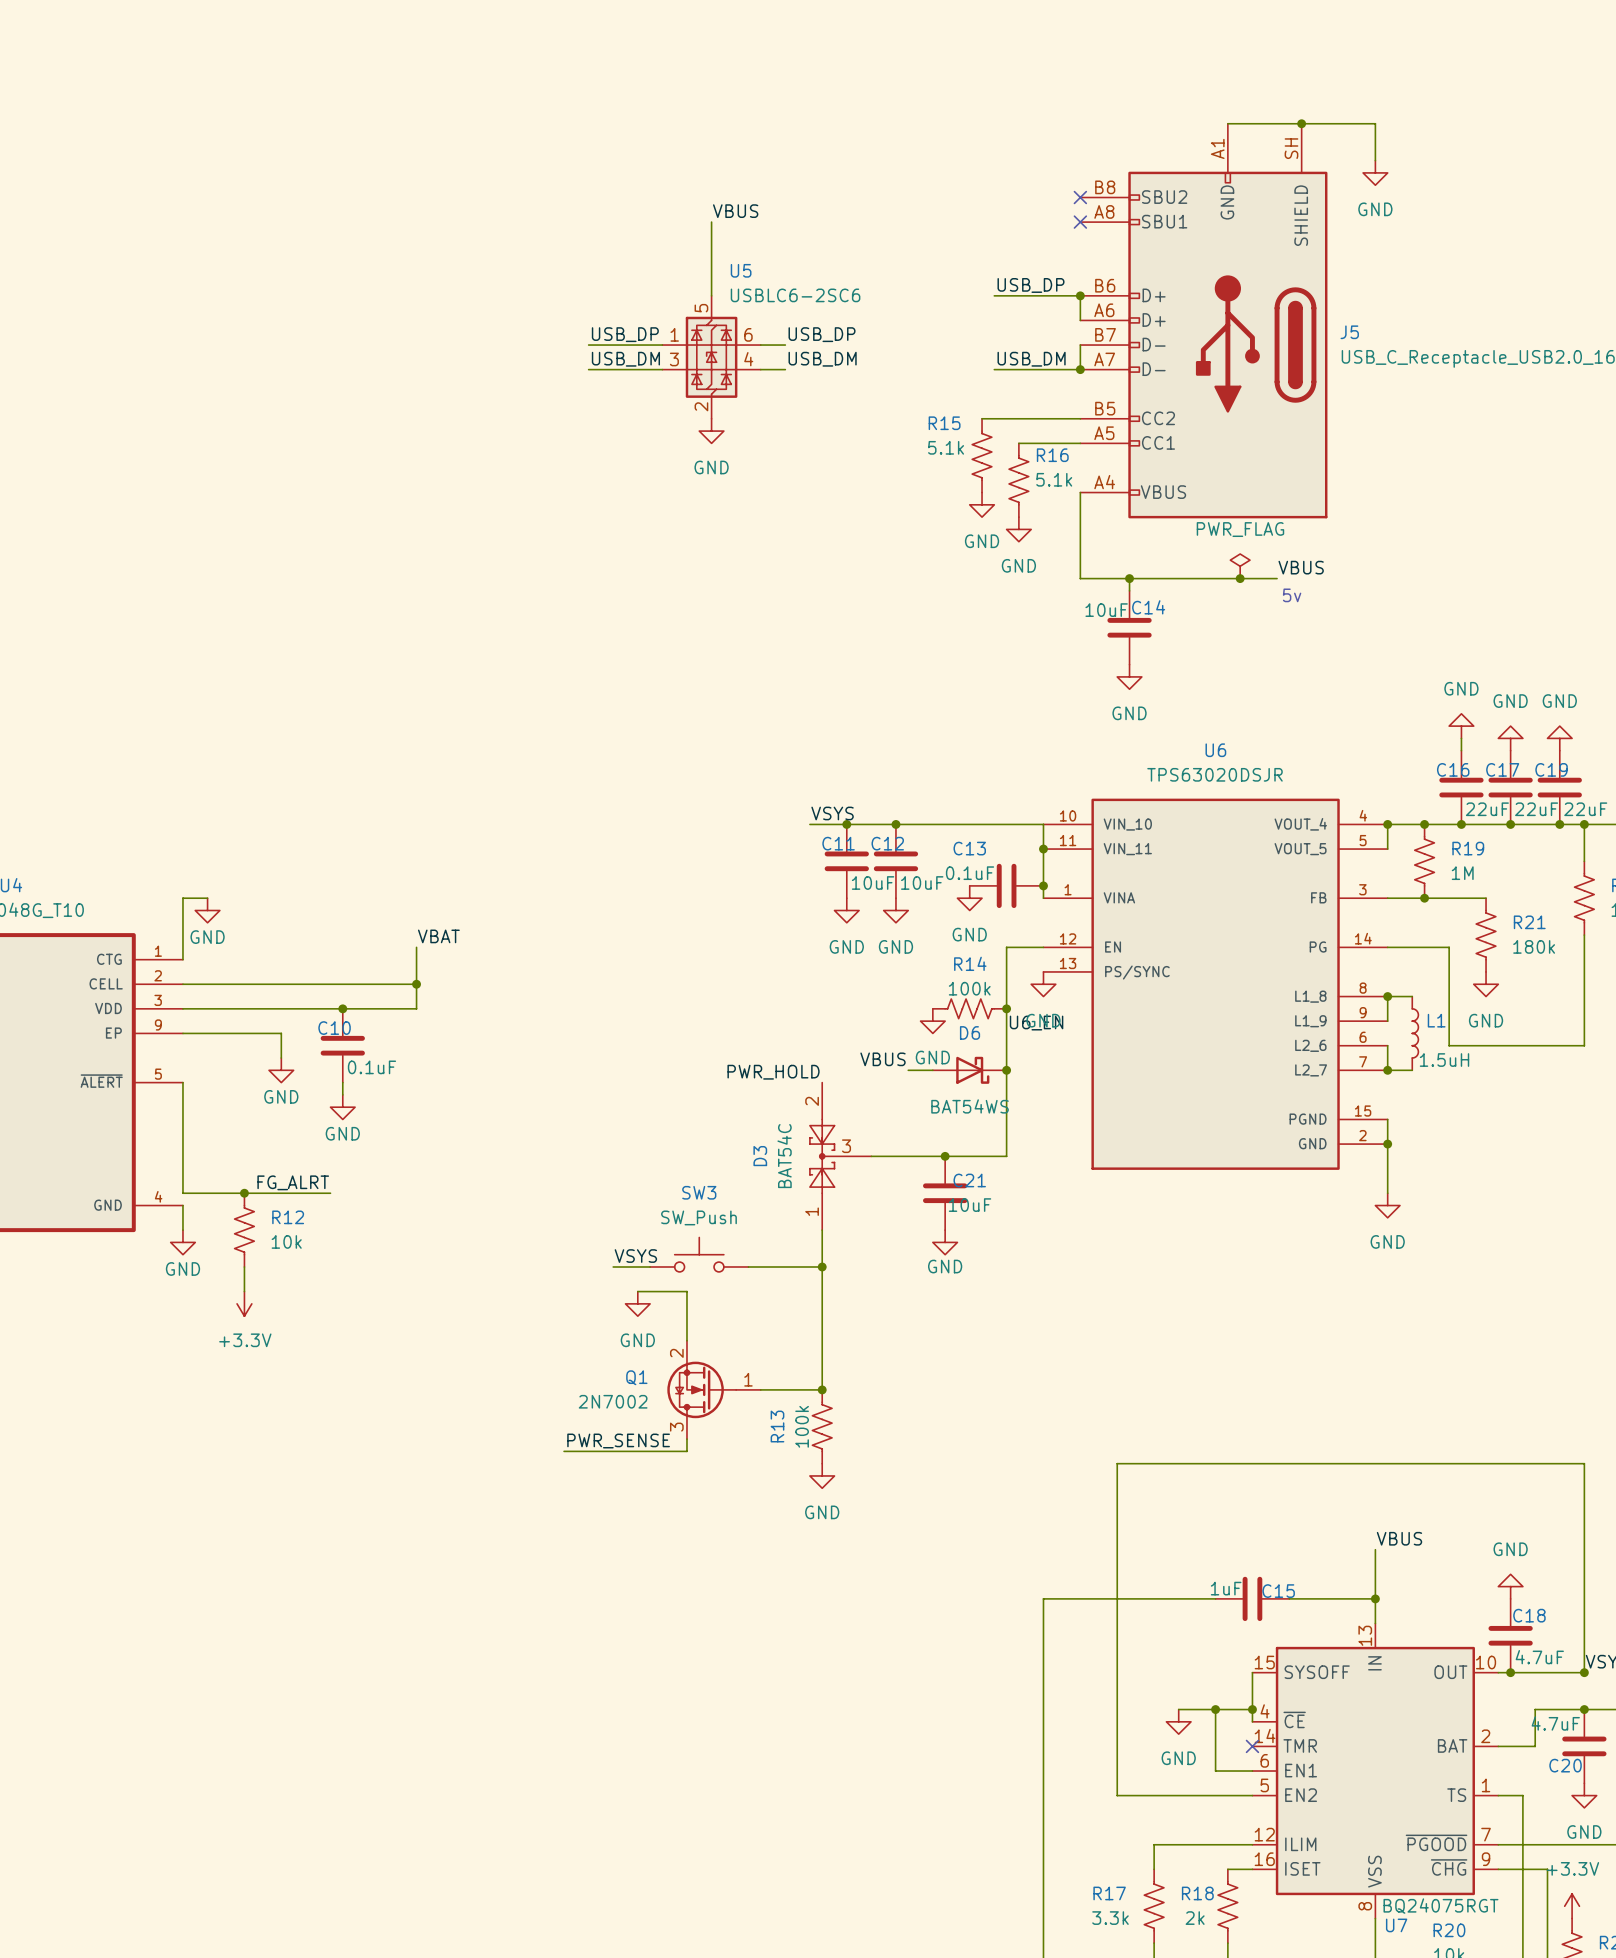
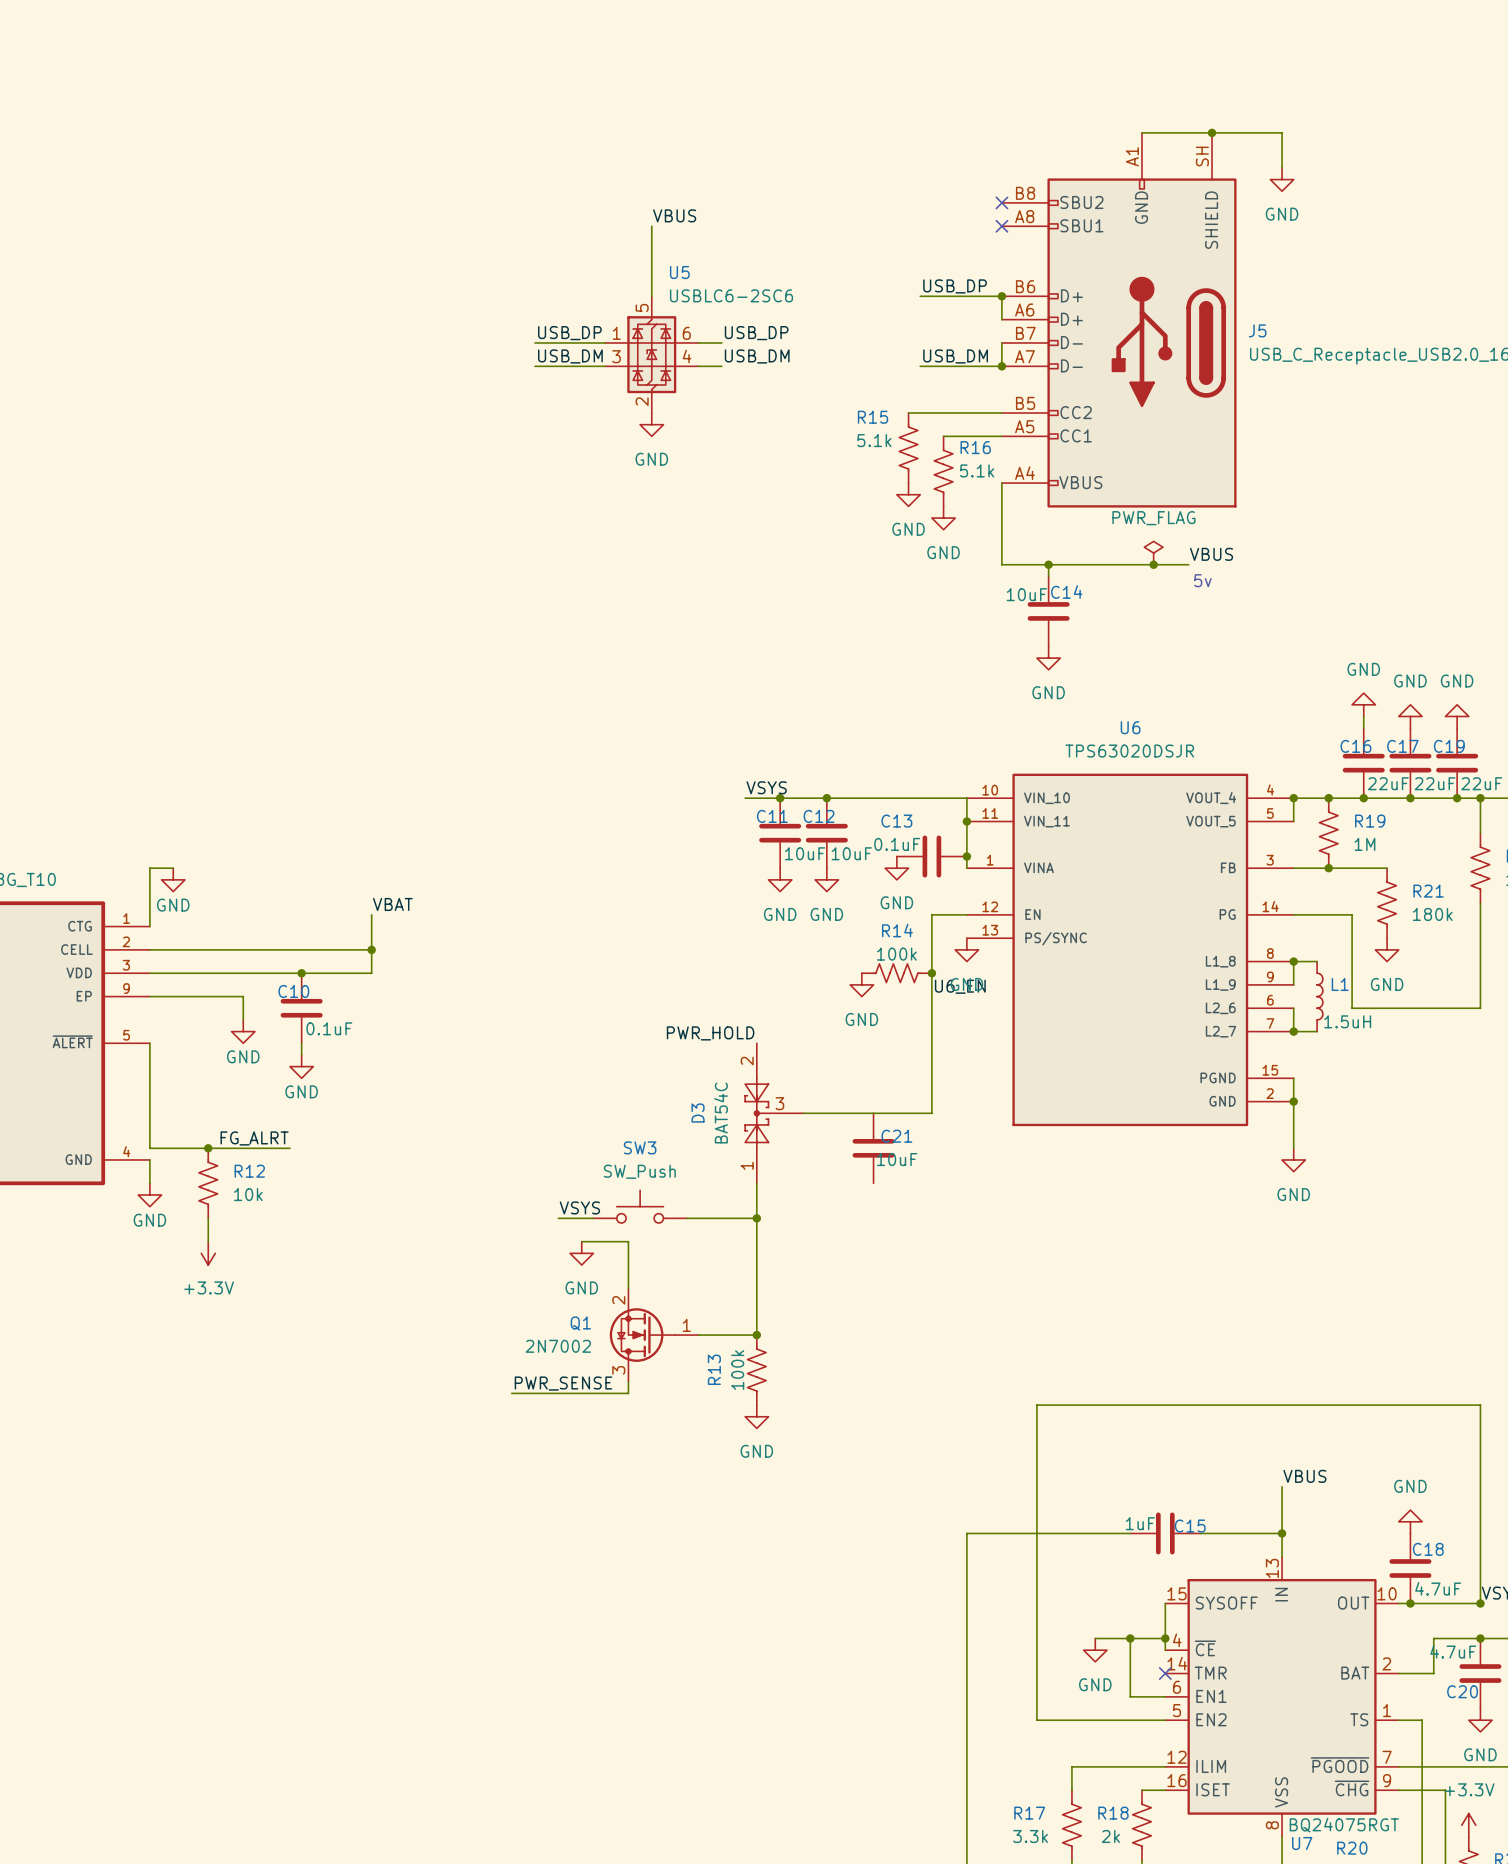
label: VBUS (883, 1059) -> none
wire: (908, 1070) (932, 1070) -> none
D6: BAT54WS (969, 1070) -> none
junction: (1006, 1070) -> none
junction: (945, 1156) -> none
power symbol: GND (945, 1242) -> none

